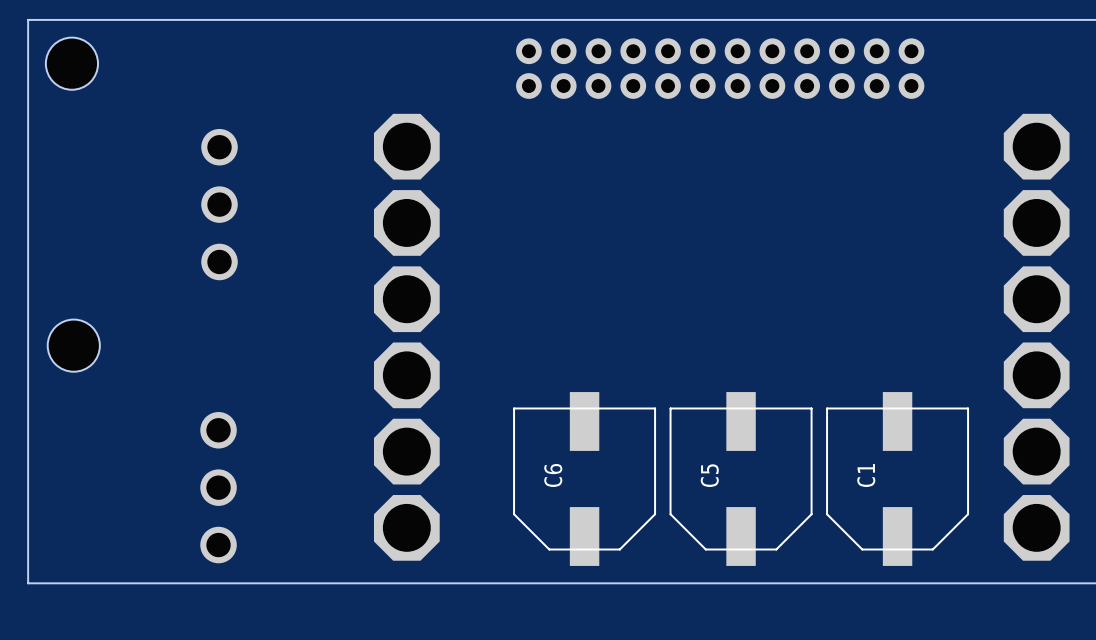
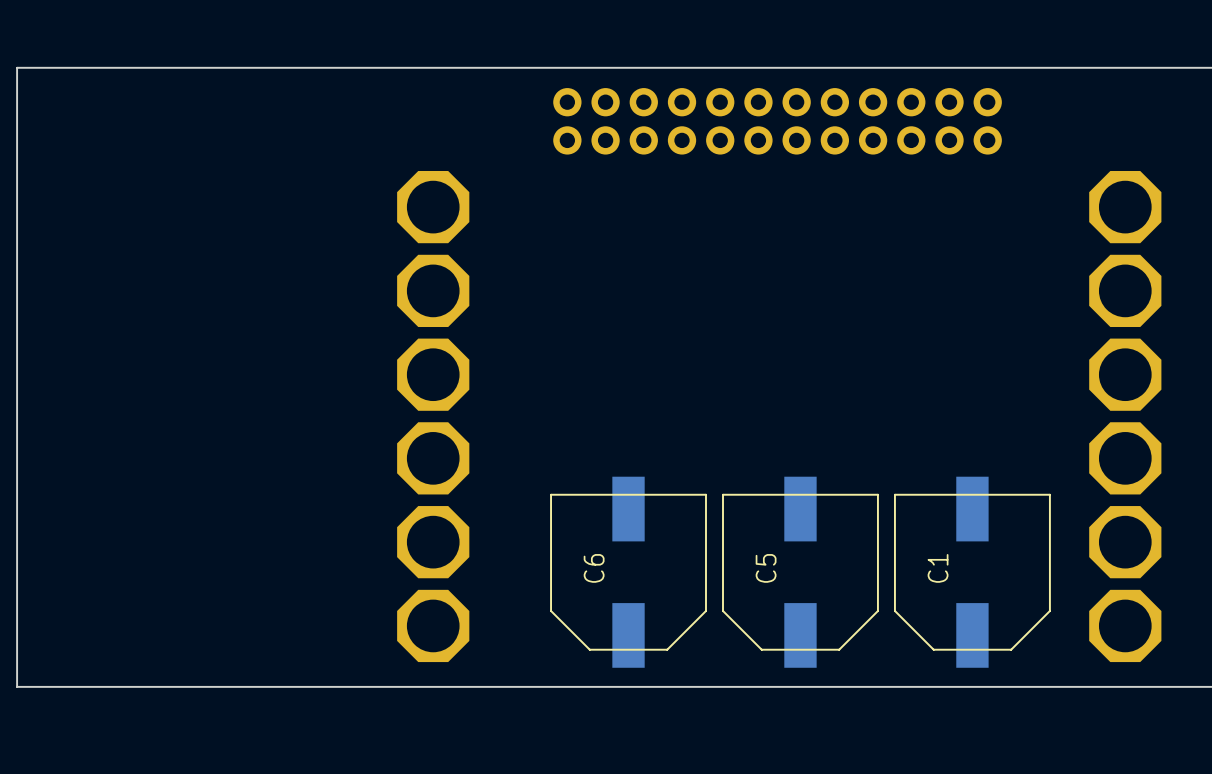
part: (71, 63) -> none
part: (219, 204) -> none
part: (73, 345) -> none
part: (218, 487) -> none

